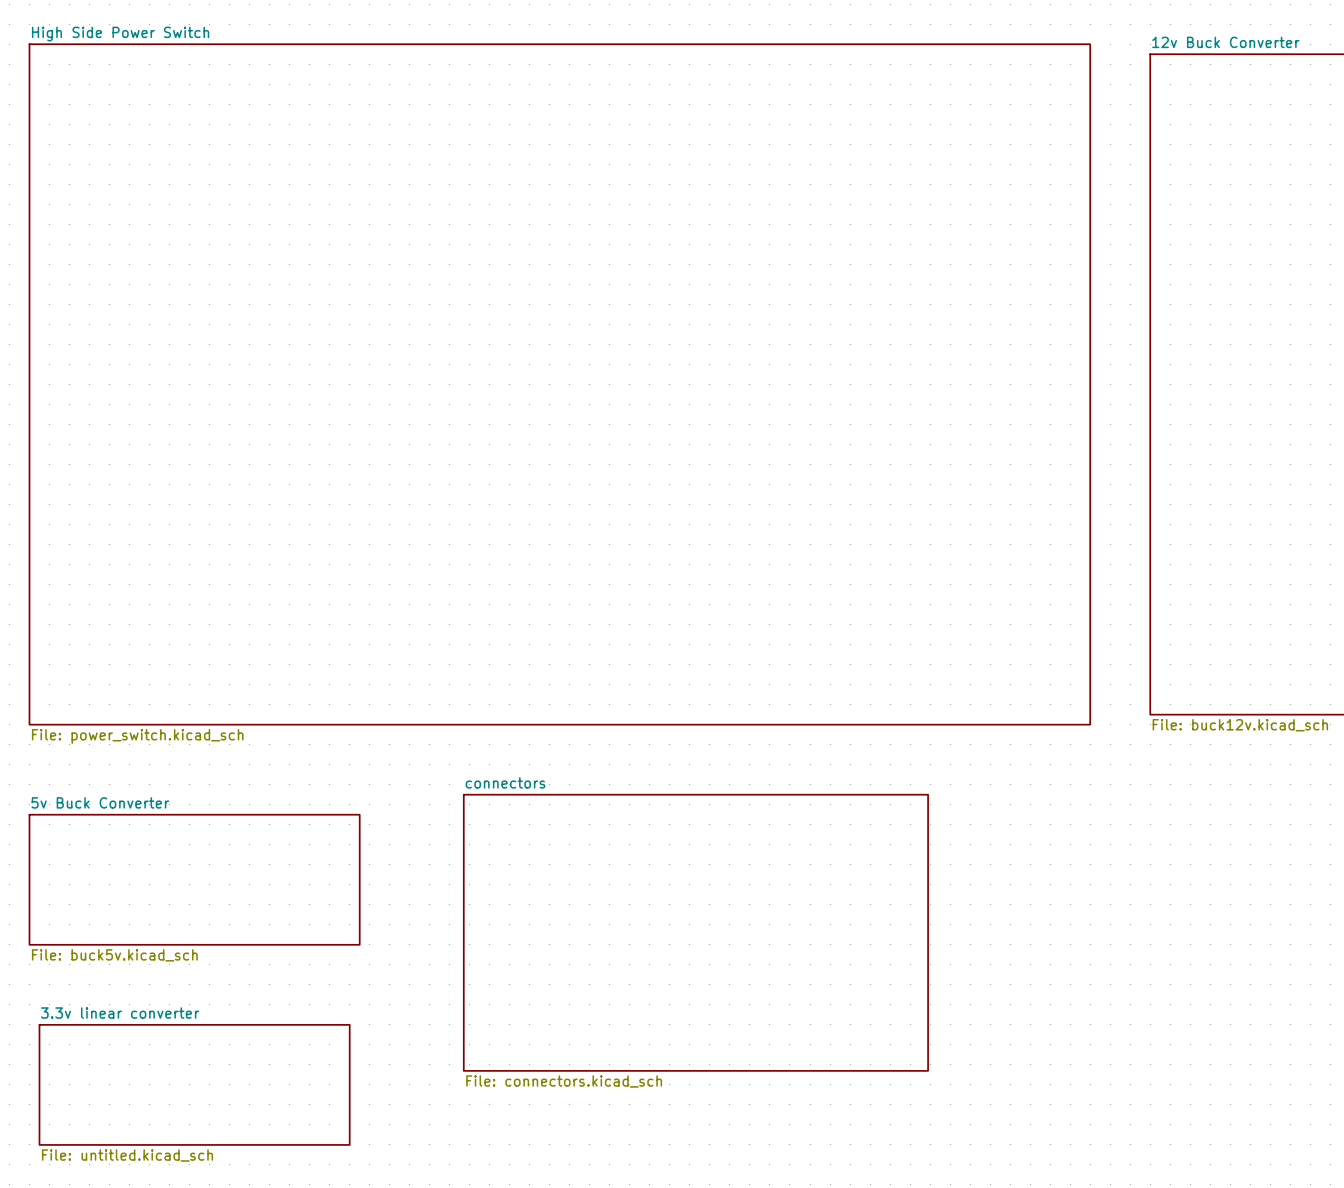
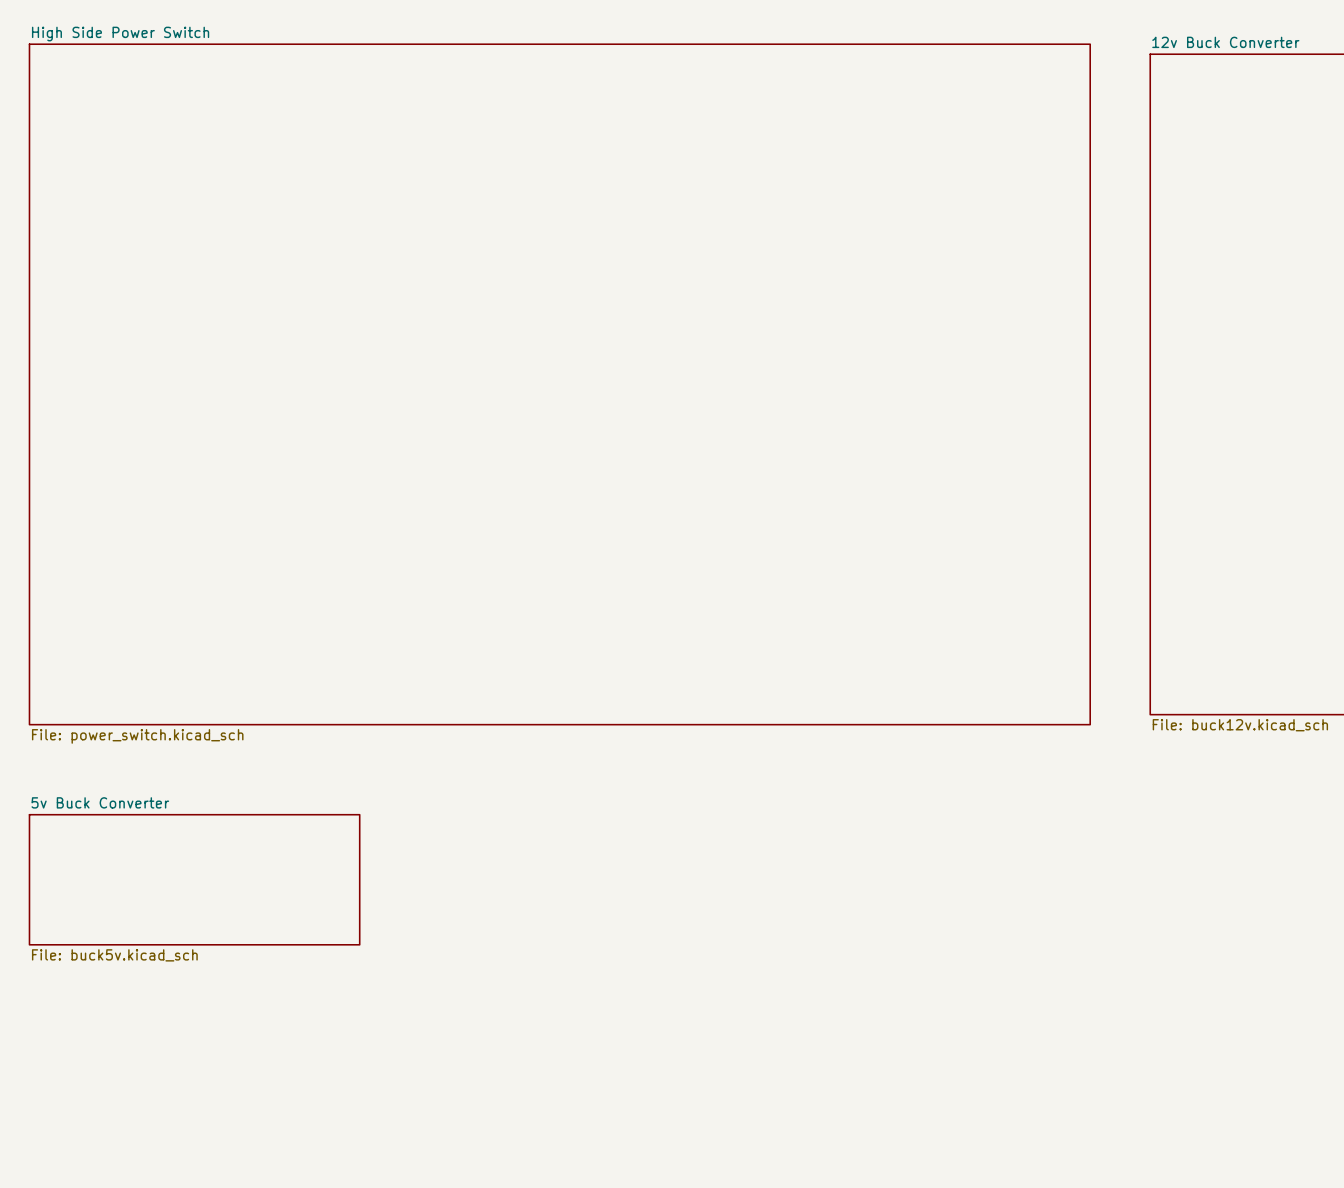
sheet connectors: File: connectors.kicad_sch (695, 932) -> none
sheet 3.3v linear converter: File: untitled.kicad_sch (194, 1084) -> none

